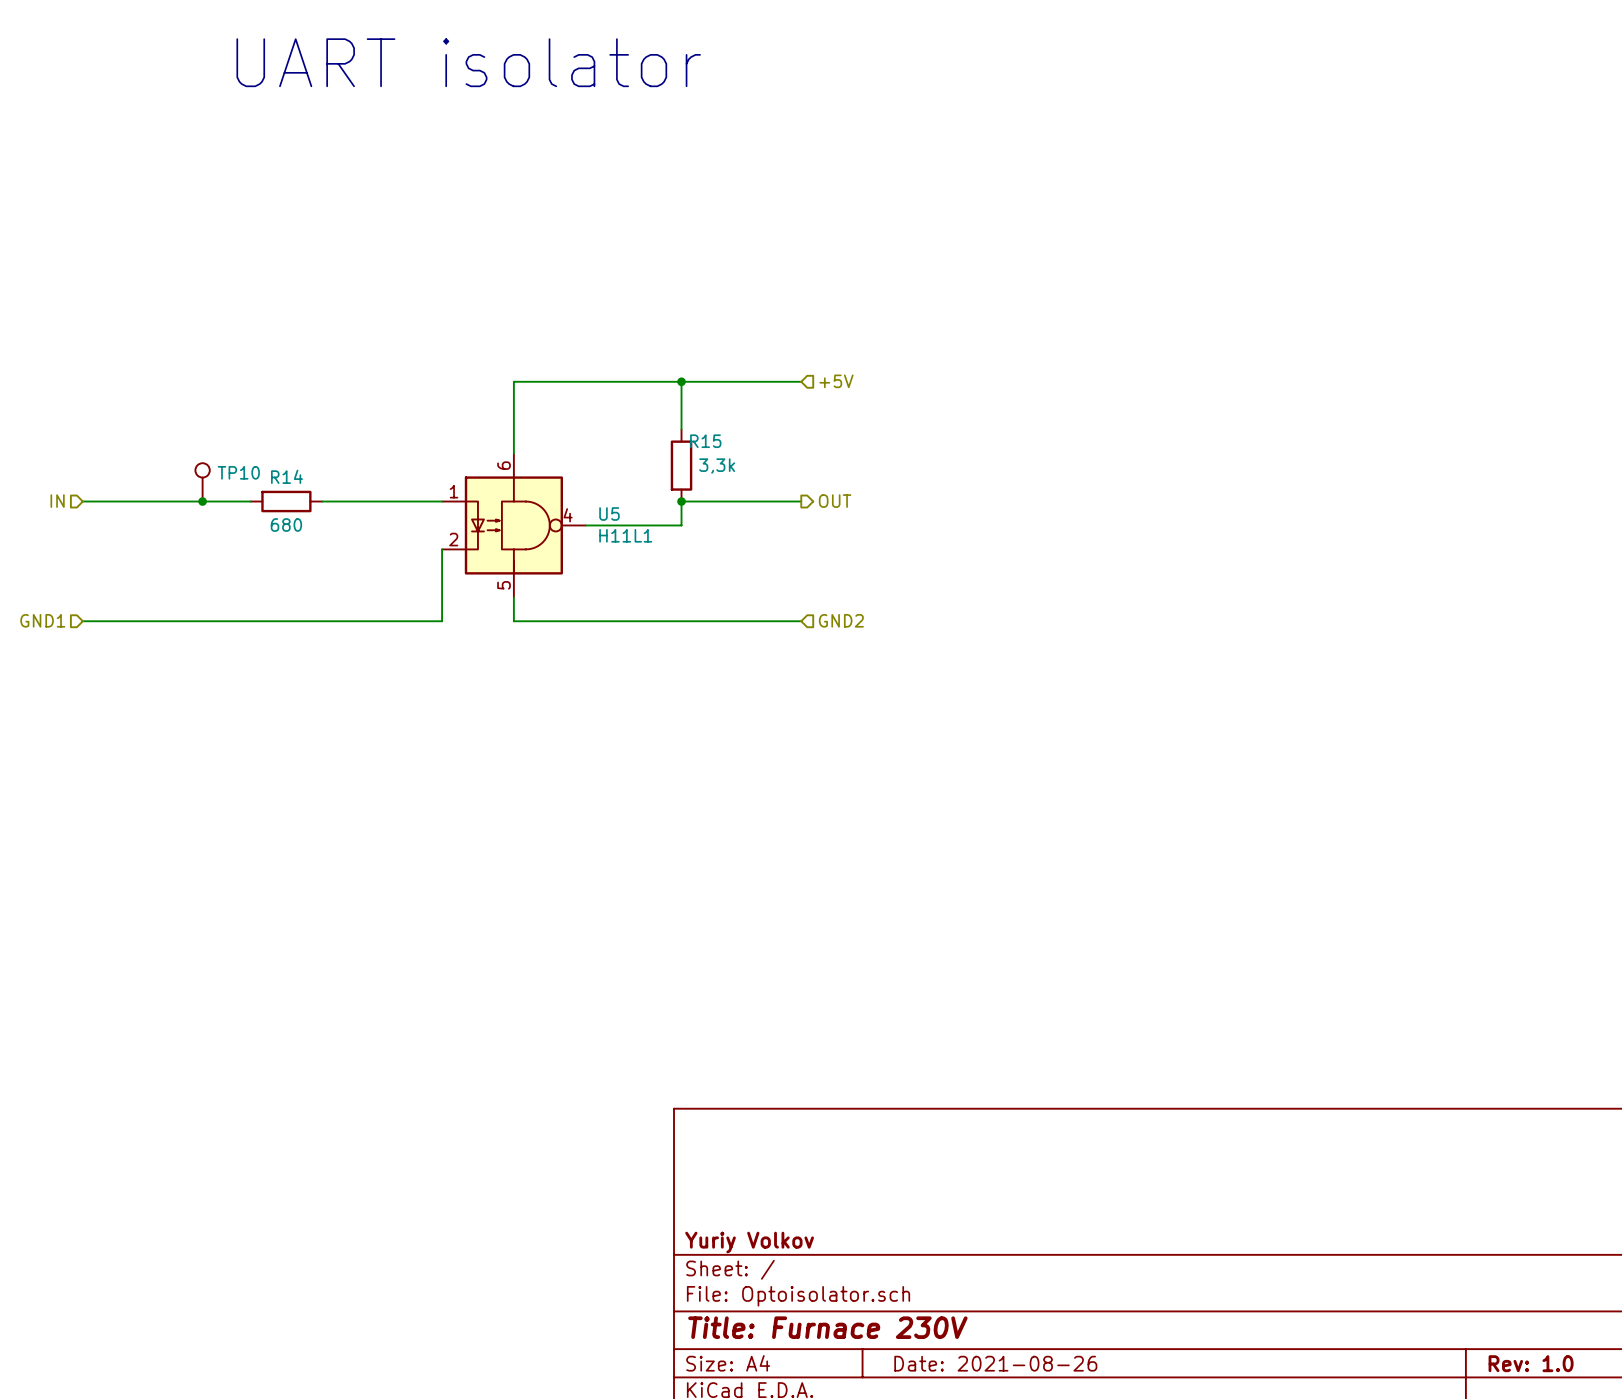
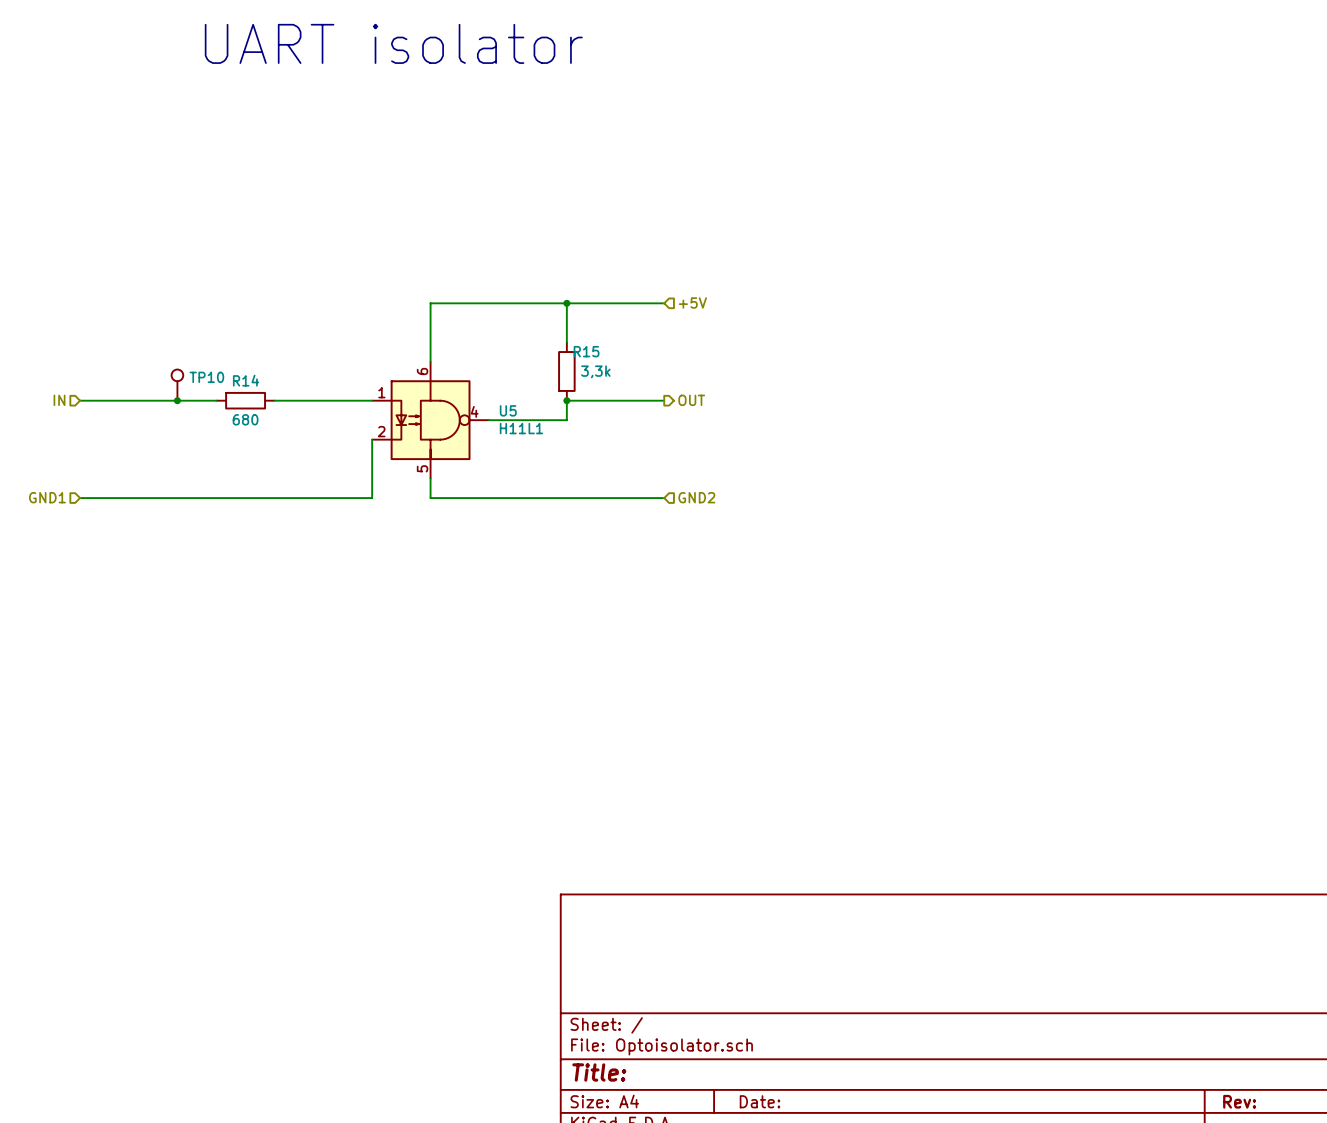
title block: Yuriy Volkov (749, 1242) -> none
title block: Title: Furnace 230V (827, 1327) -> Title: (599, 1072)
title block: Date: 2021-08-26 (995, 1363) -> Date: (760, 1101)
title block: Rev: 1.0 (1531, 1363) -> Rev: (1239, 1101)

